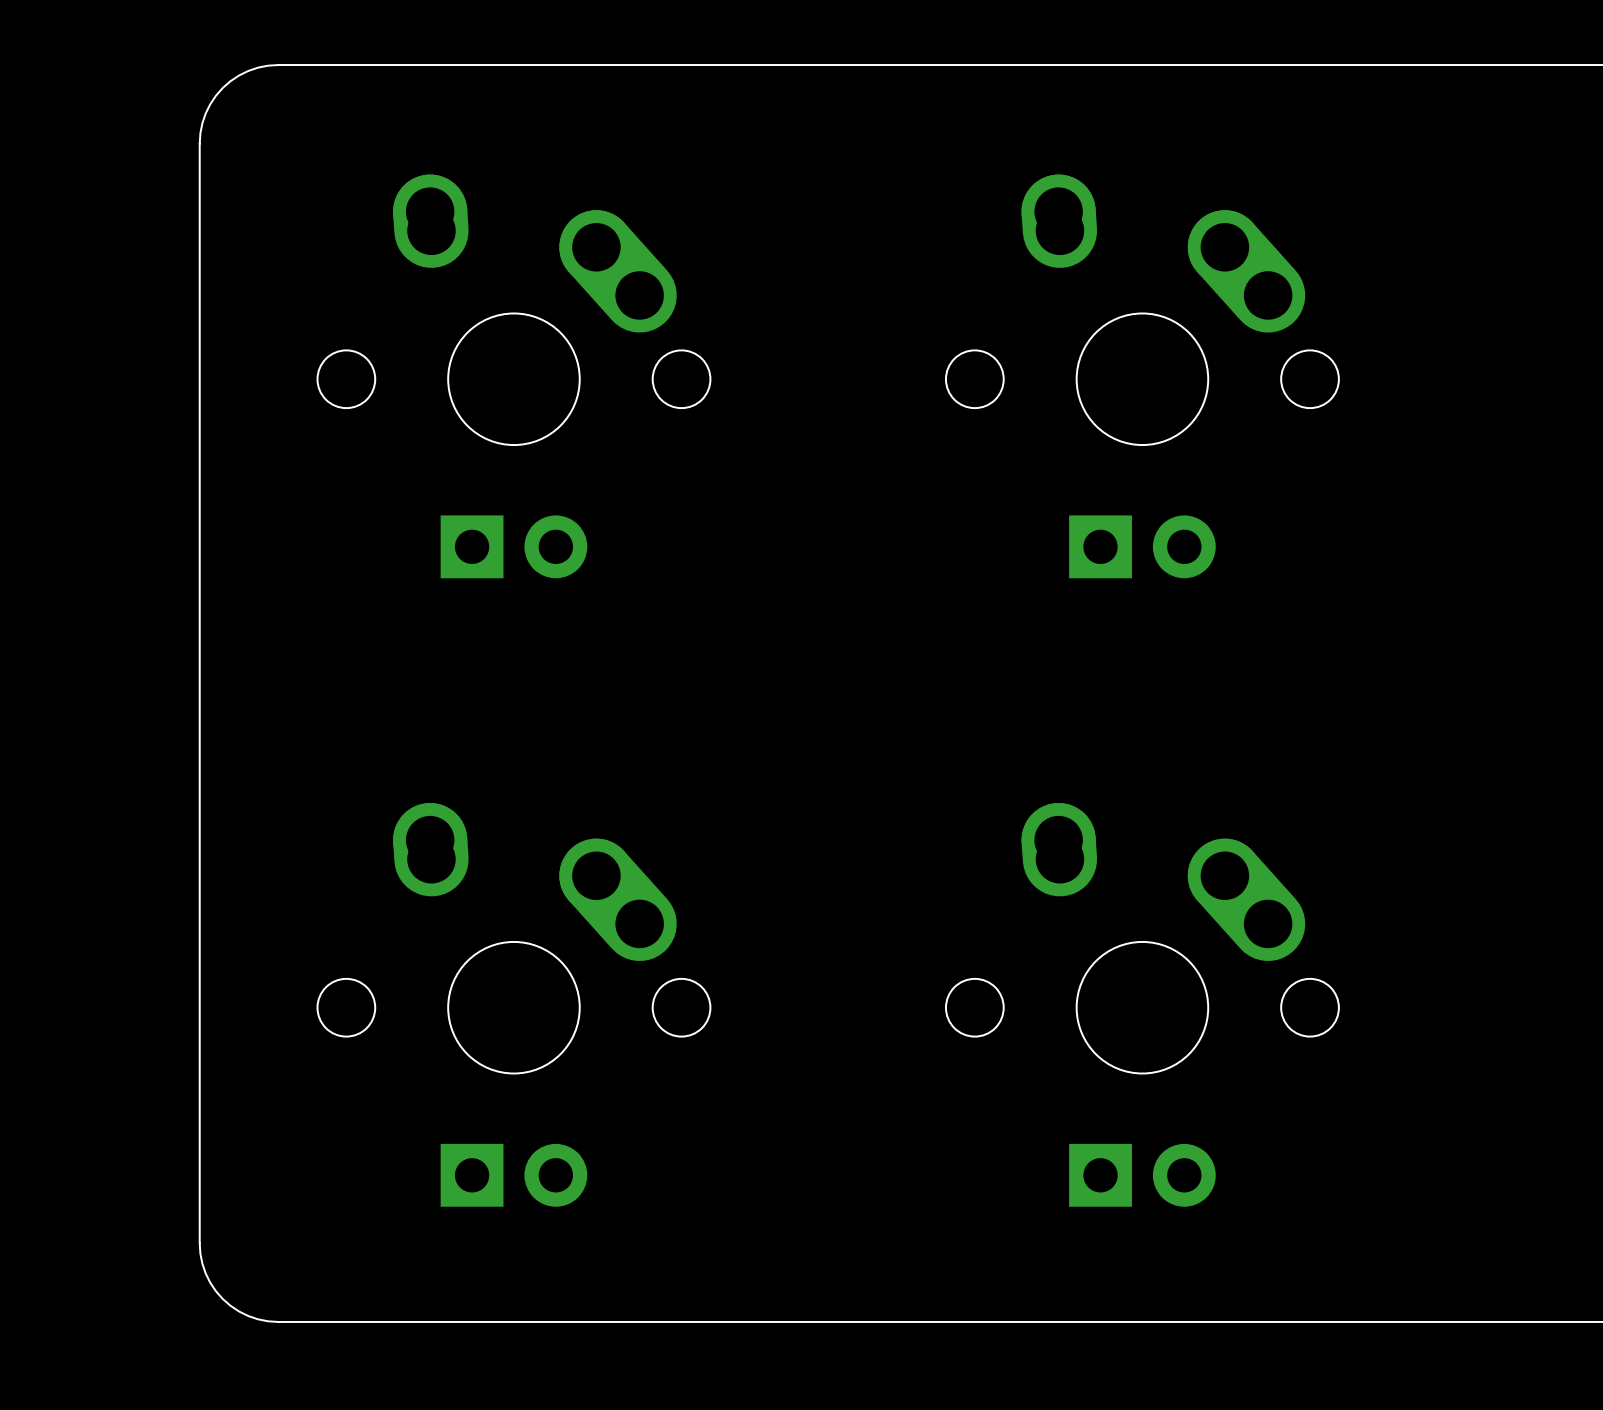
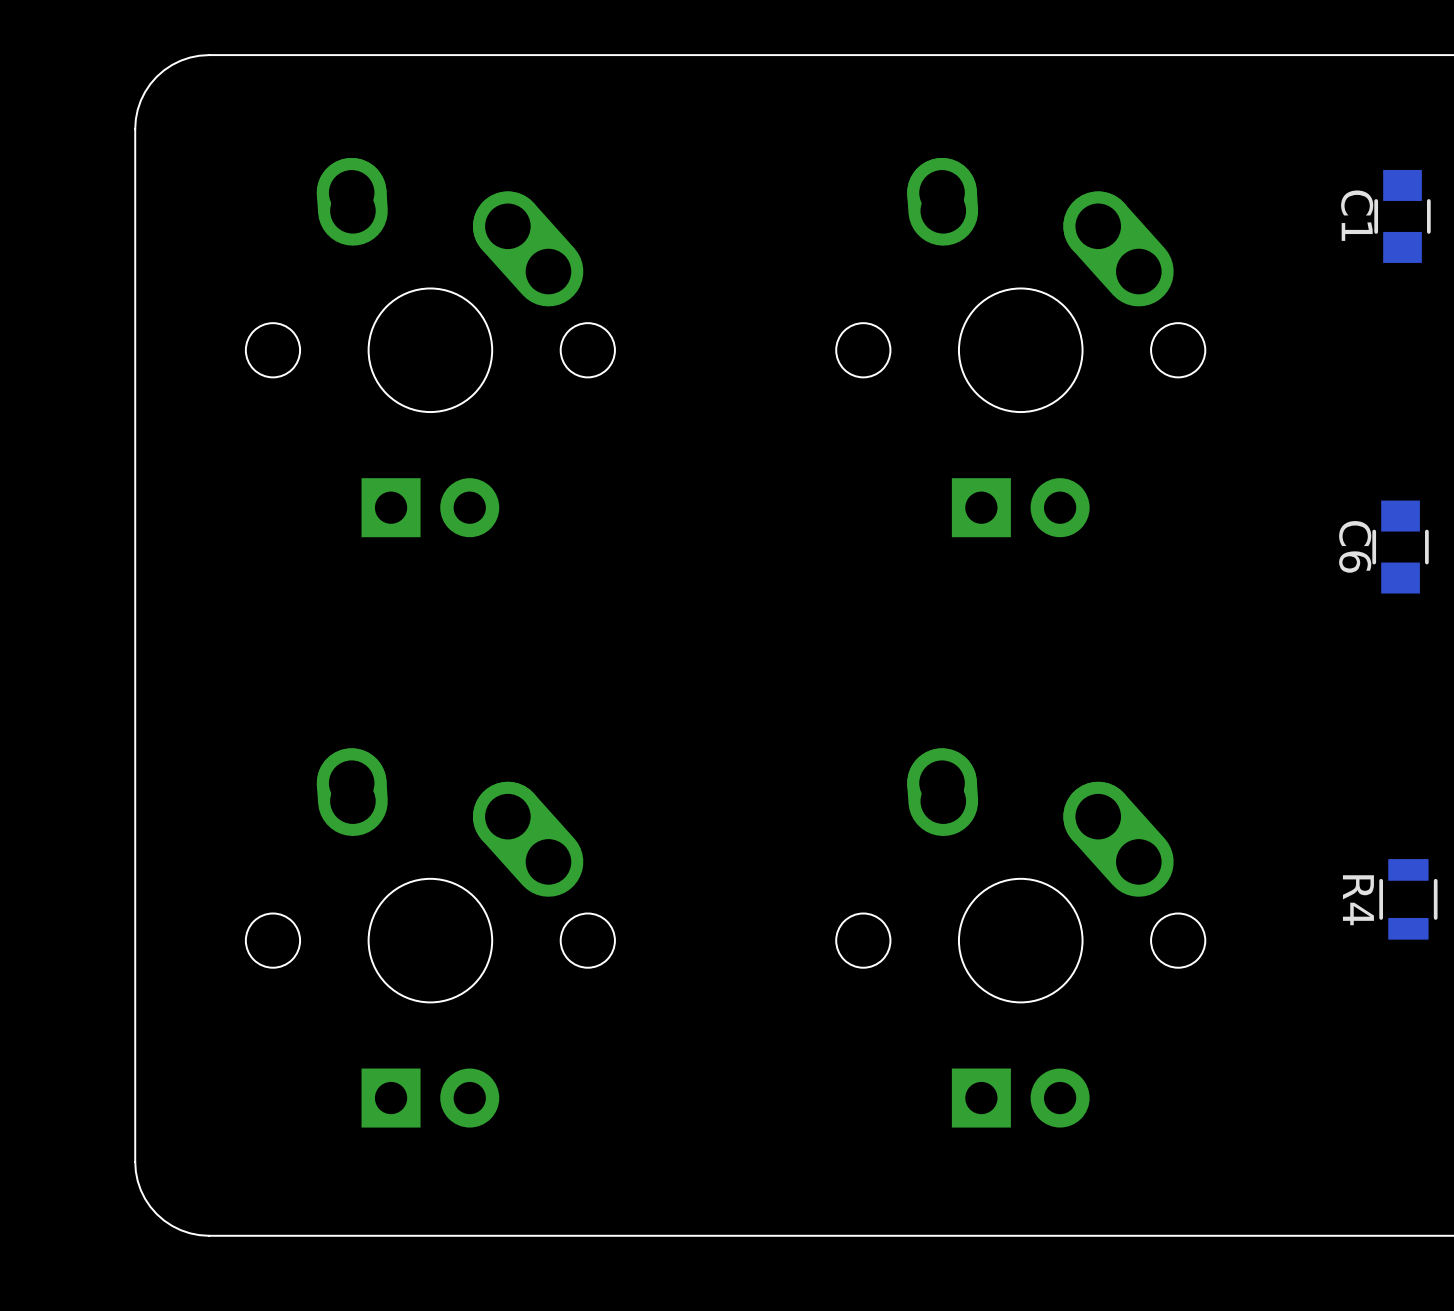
C1: none -> (1402, 216)
C6: none -> (1400, 547)
R4: none -> (1408, 899)

